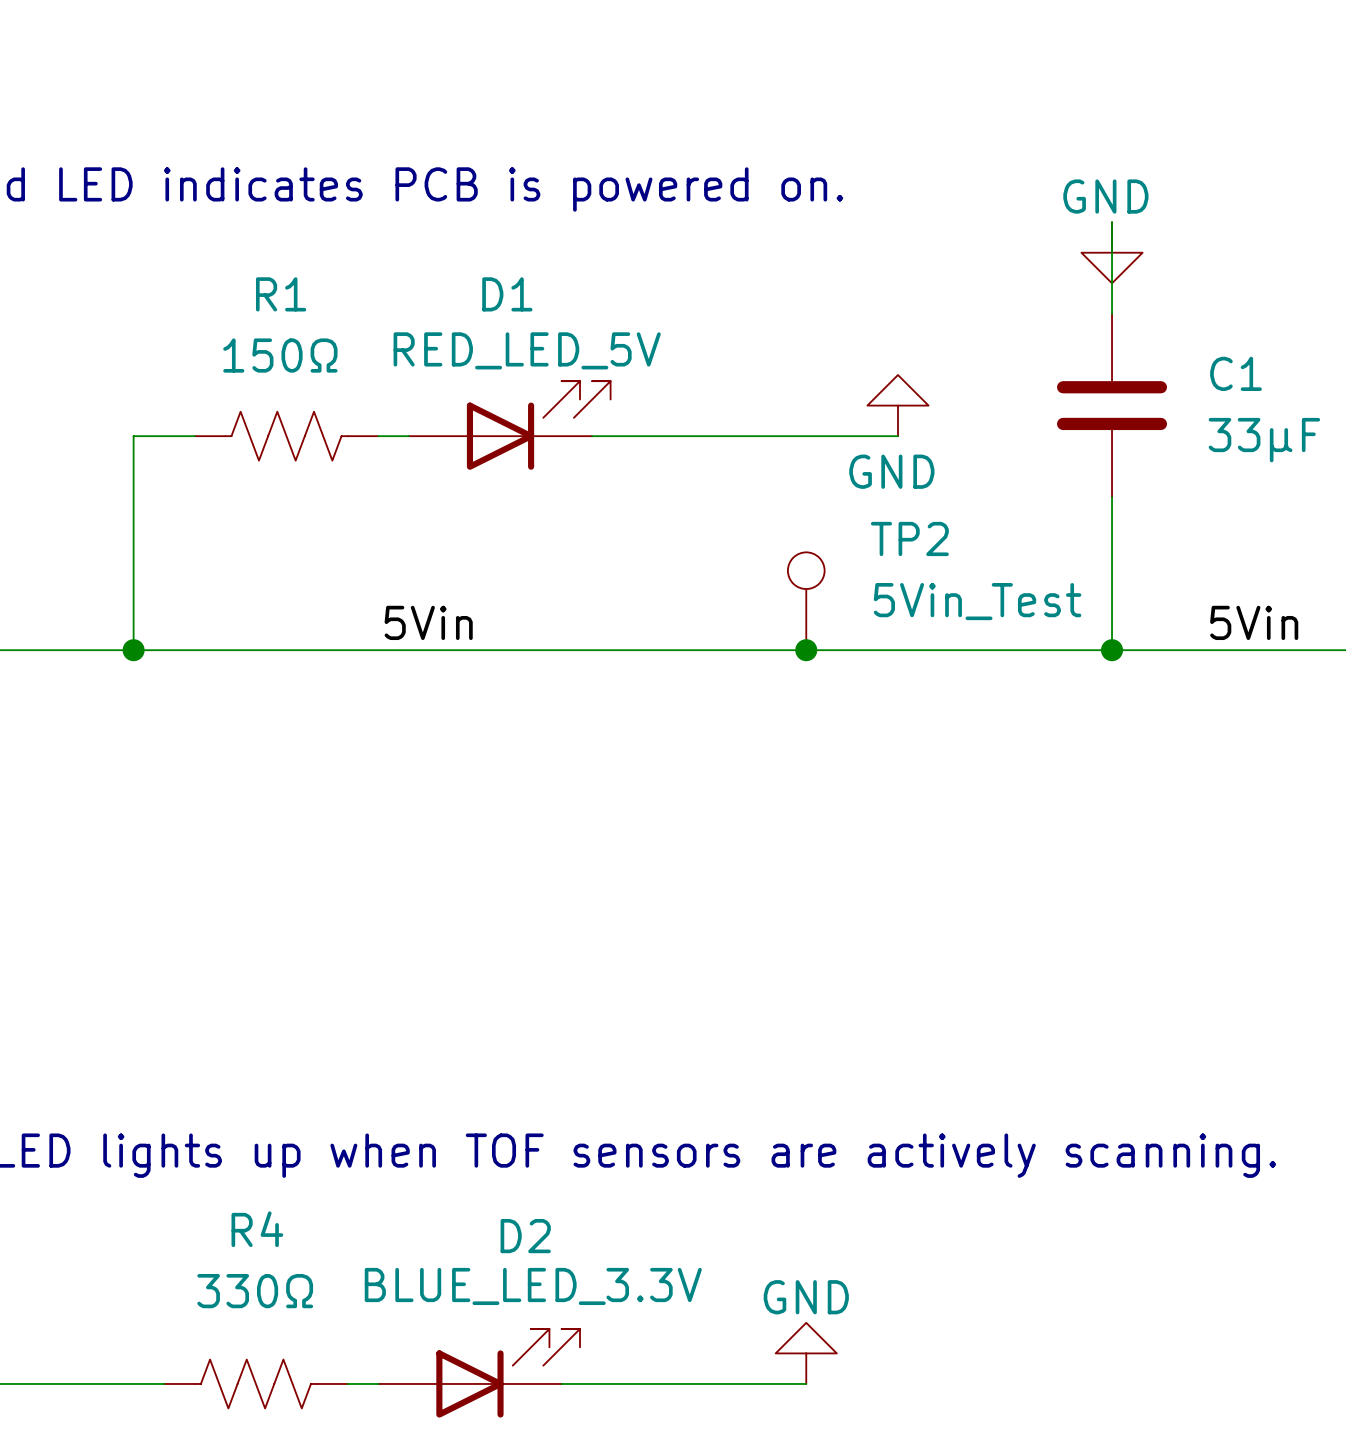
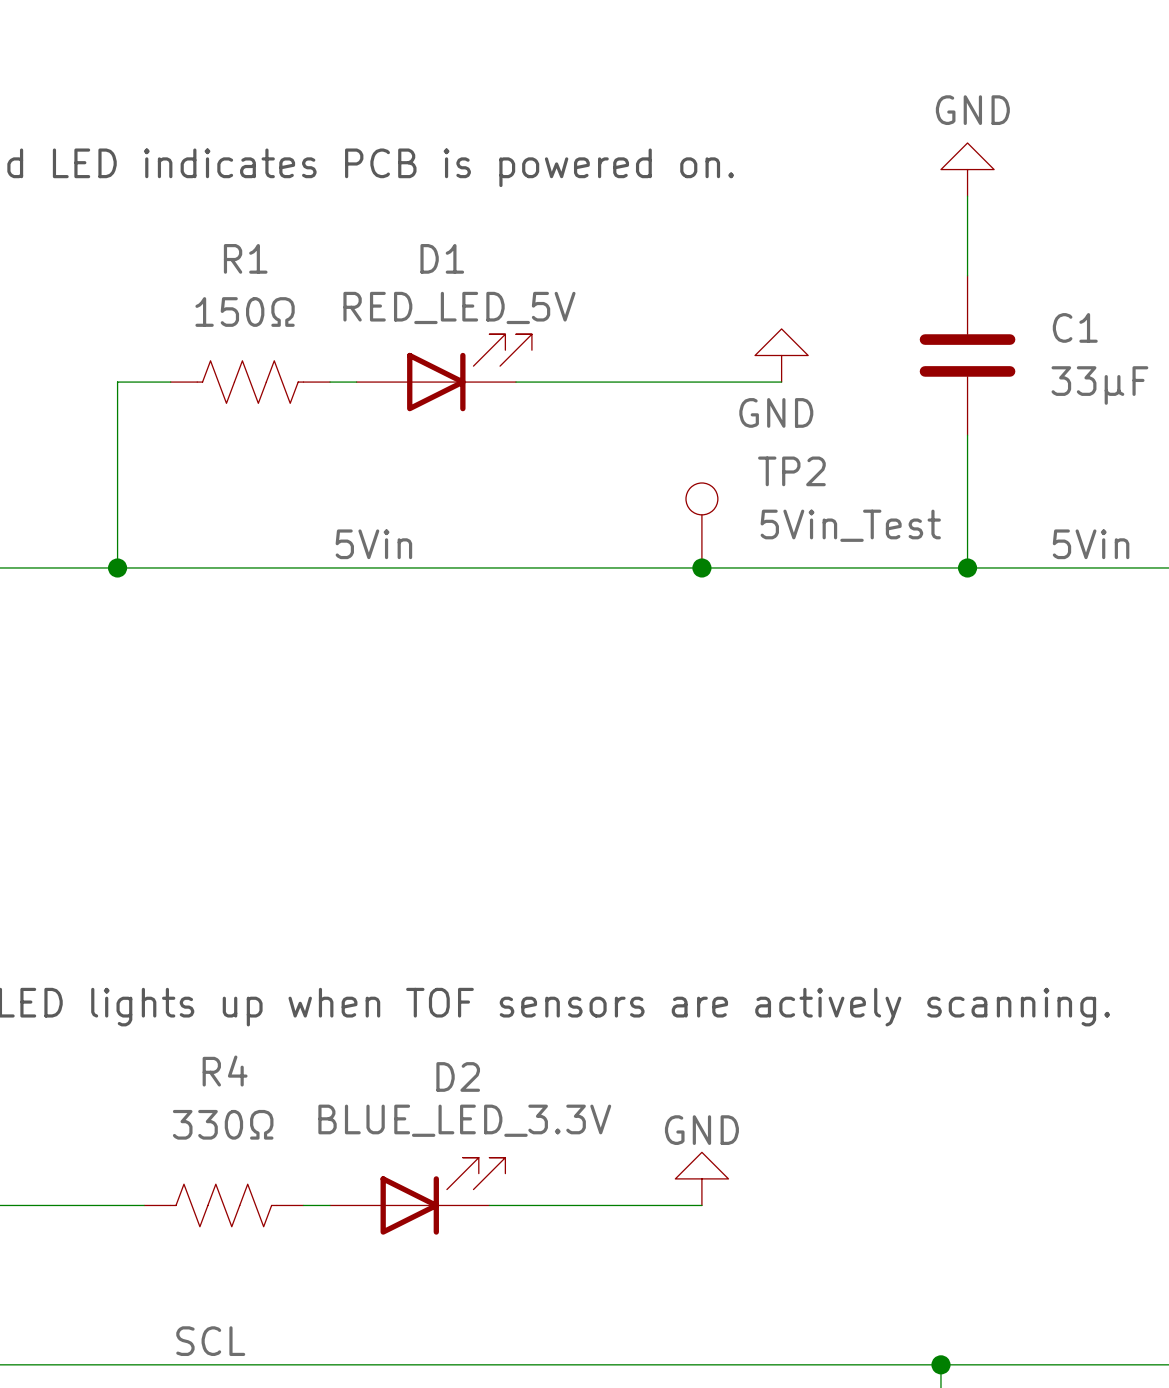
power symbol rotation: 0° (1112, 252) -> 180° (967, 169)
power symbol position: GND (1112, 252) -> GND (967, 169)

